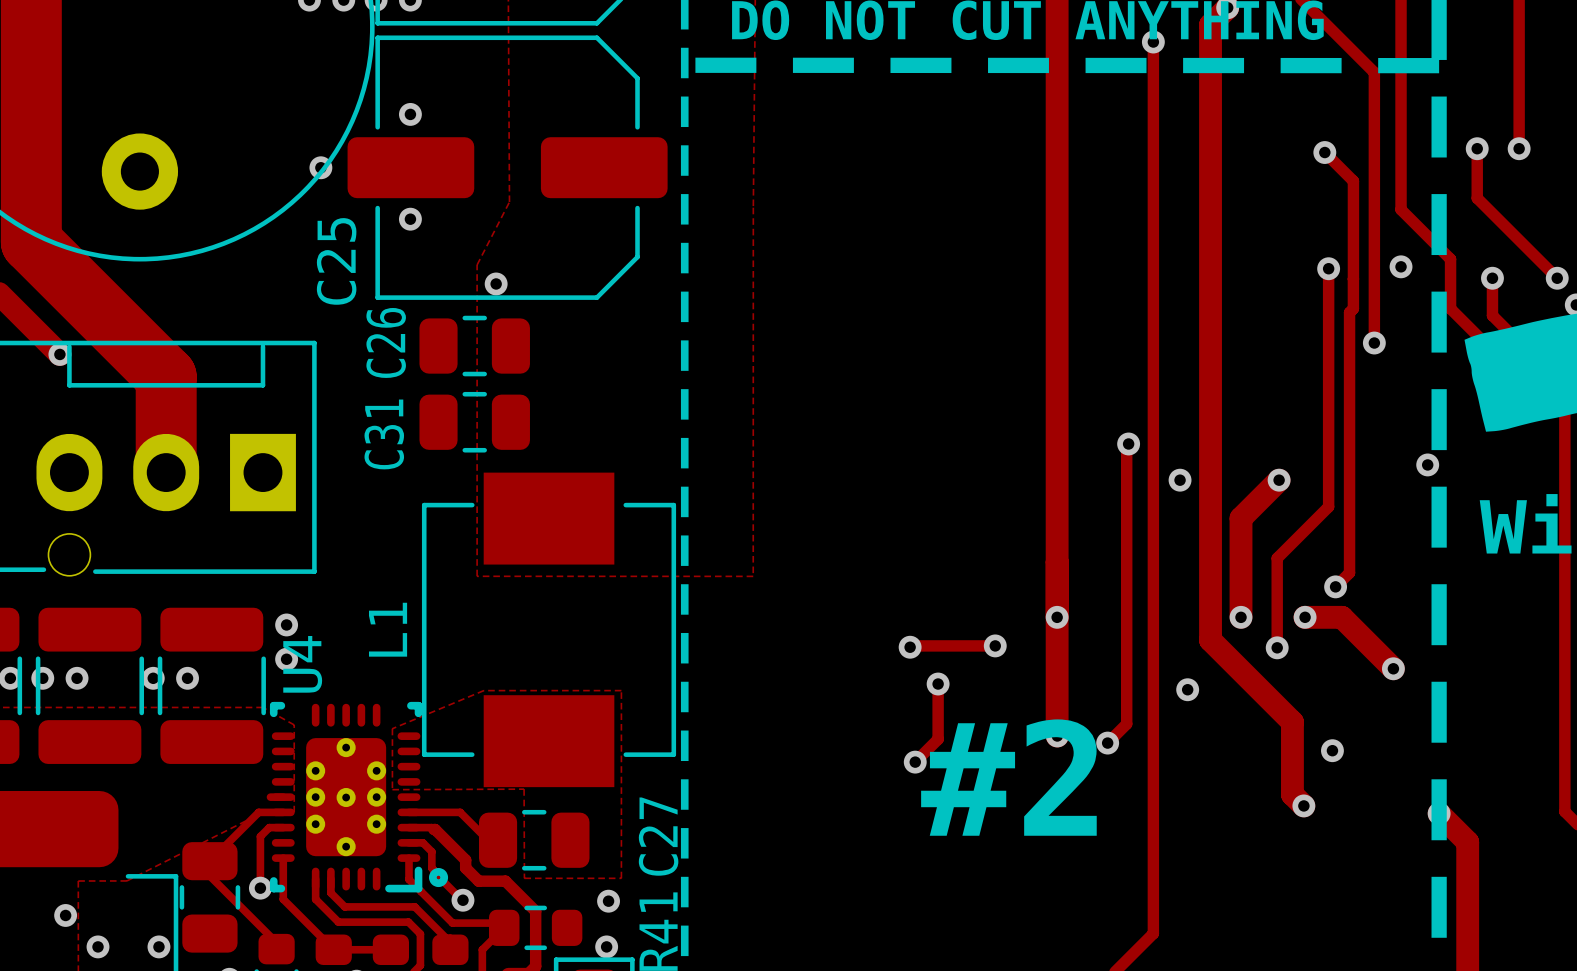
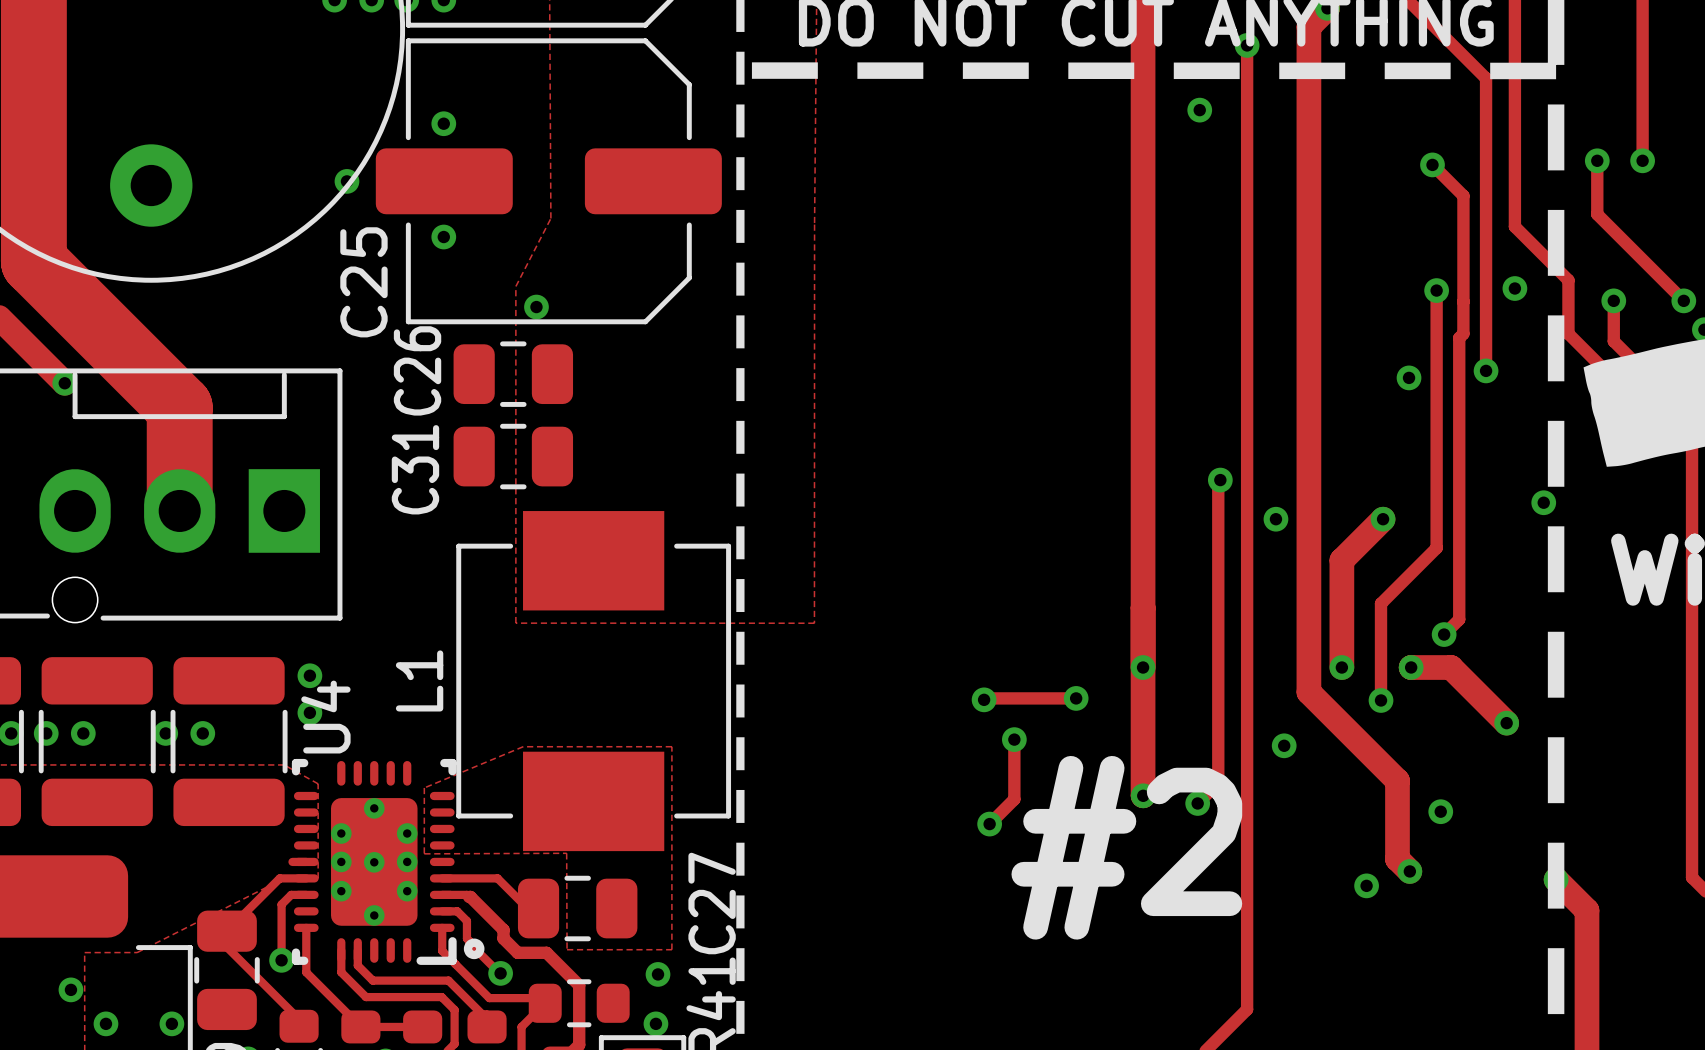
via: none -> (1199, 110)
via: none -> (1409, 377)
via: none -> (1366, 885)

